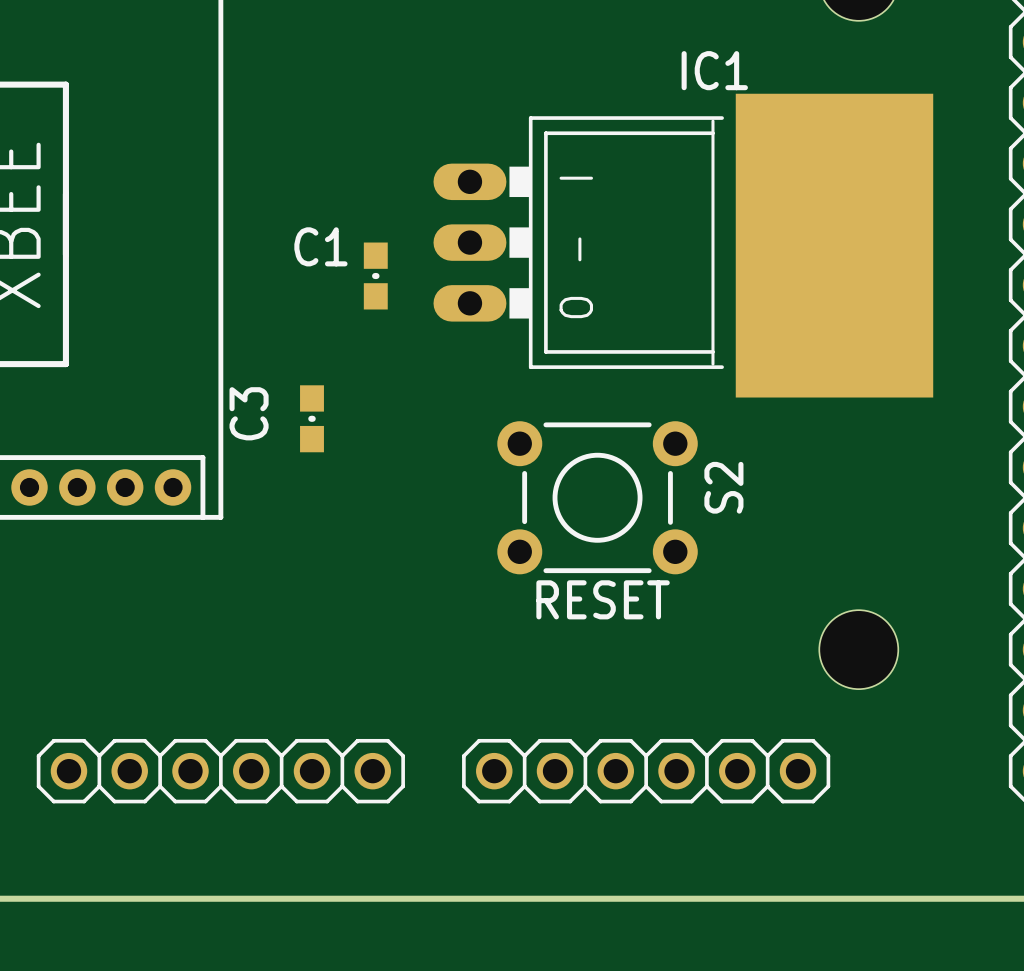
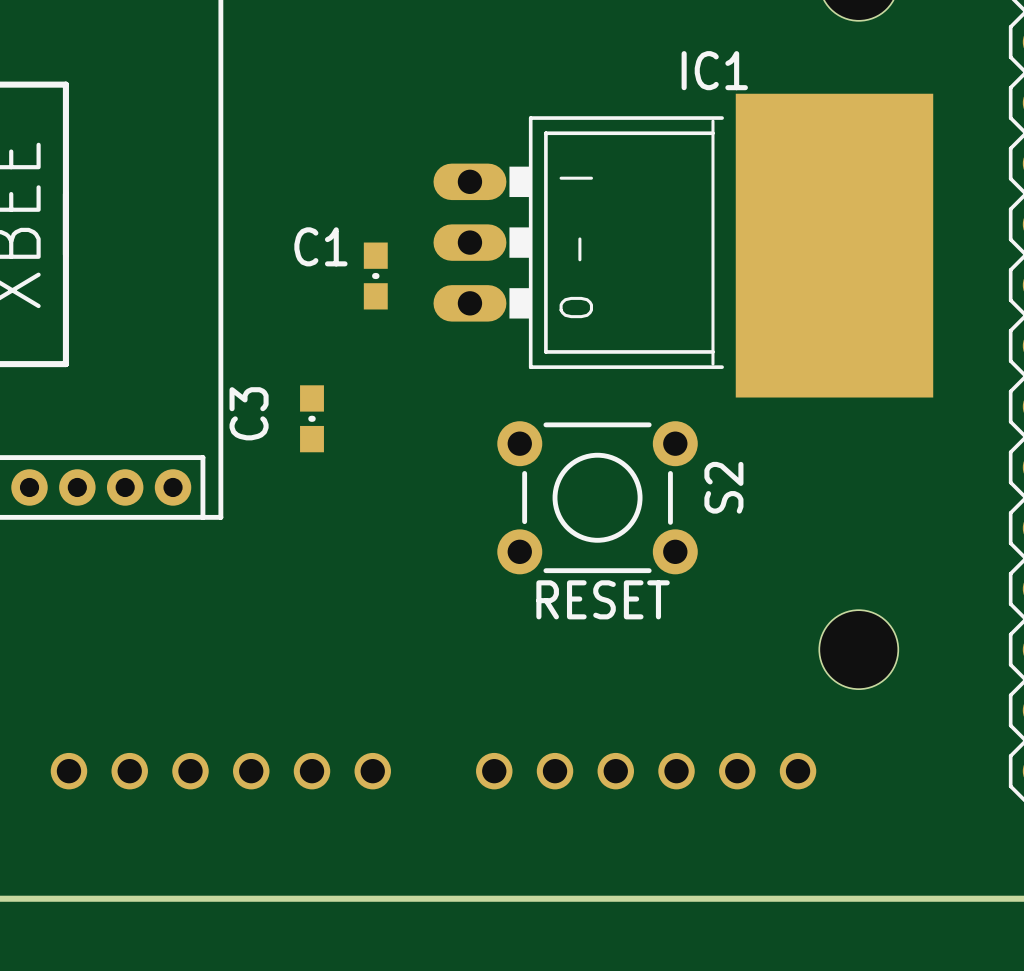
part side: top (220, 771) -> bottom (220, 771)
part side: top (646, 771) -> bottom (646, 771)

